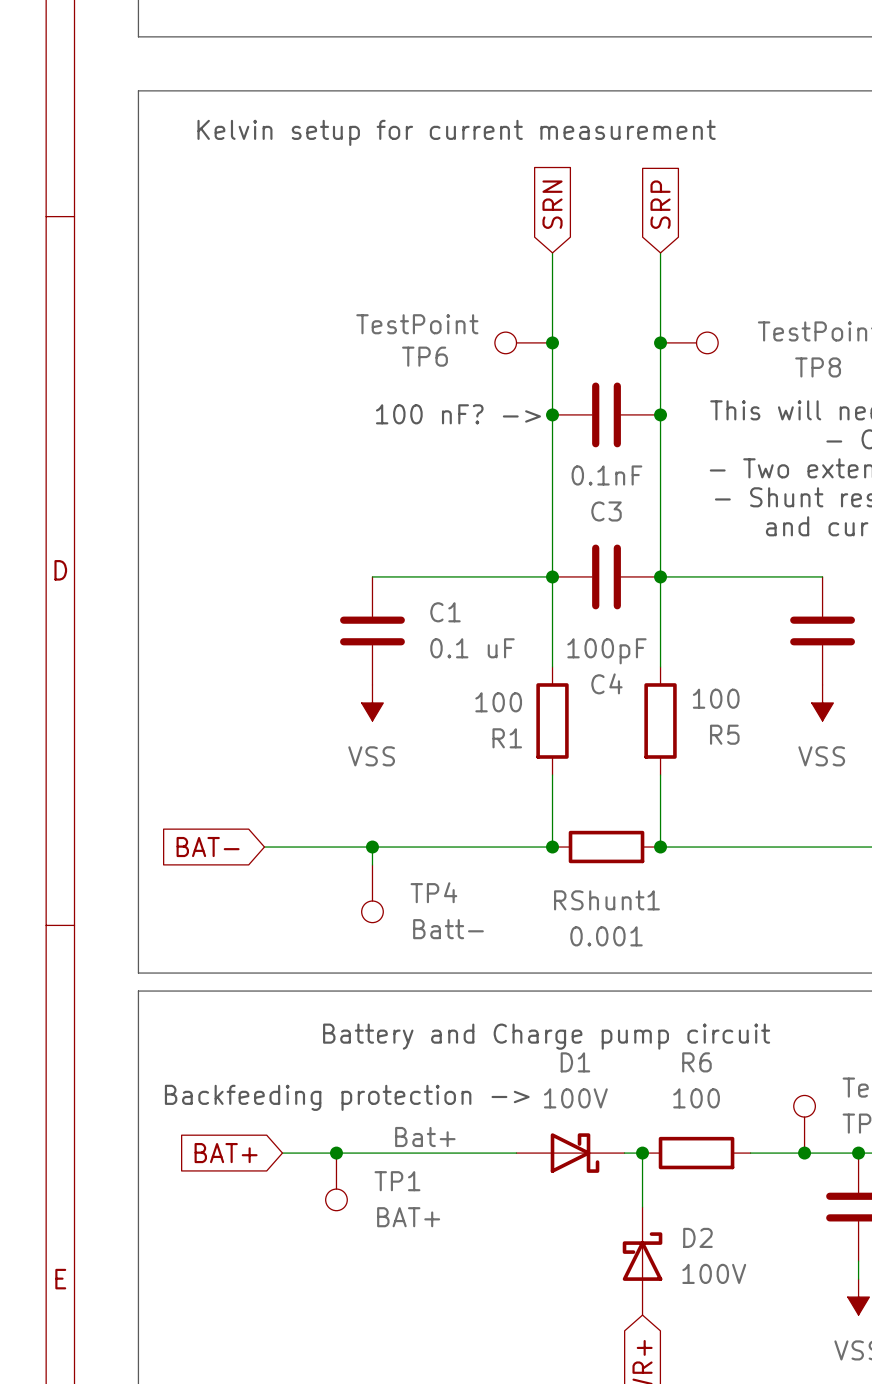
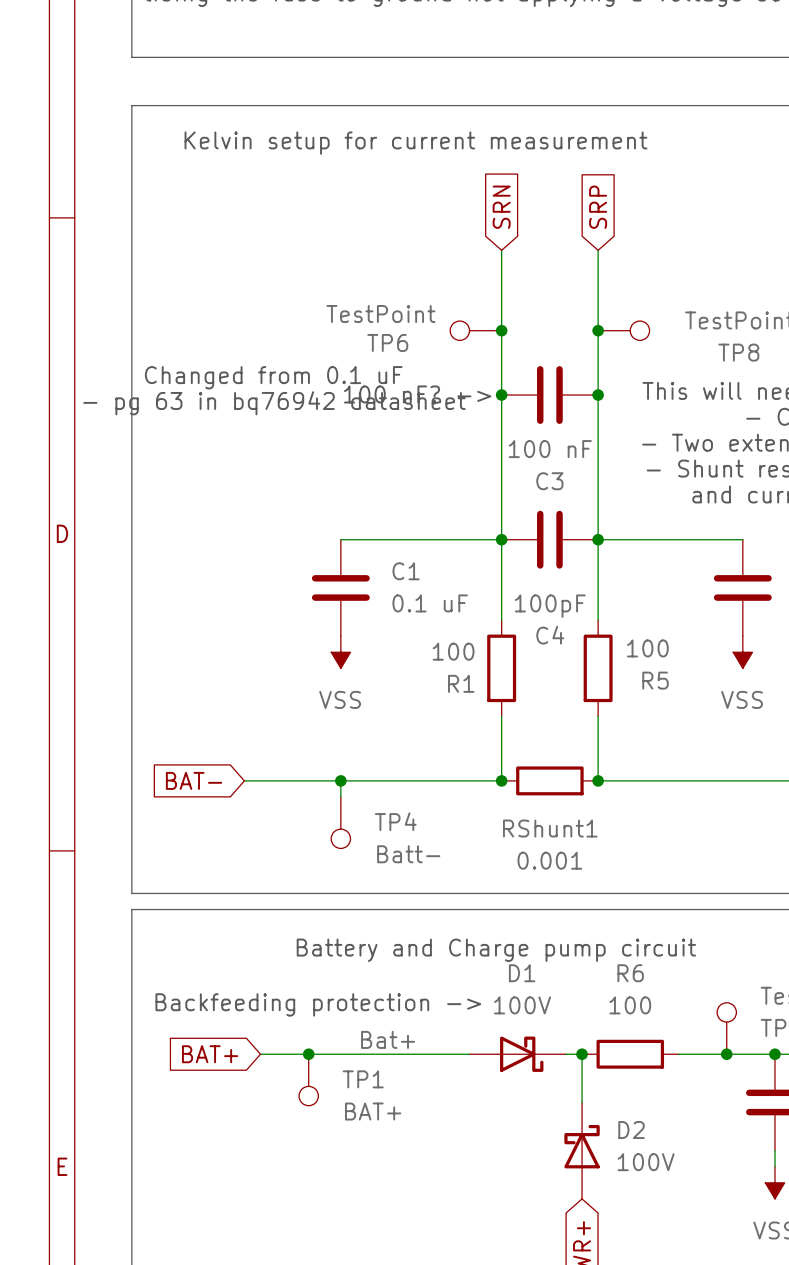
text: none -> Changed from 0.1 uF (273, 377)
text: none -> - pg 63 in bq76942 datasheet (274, 403)
C3 value: 0.1nF (606, 475) -> 100 nF (550, 449)

